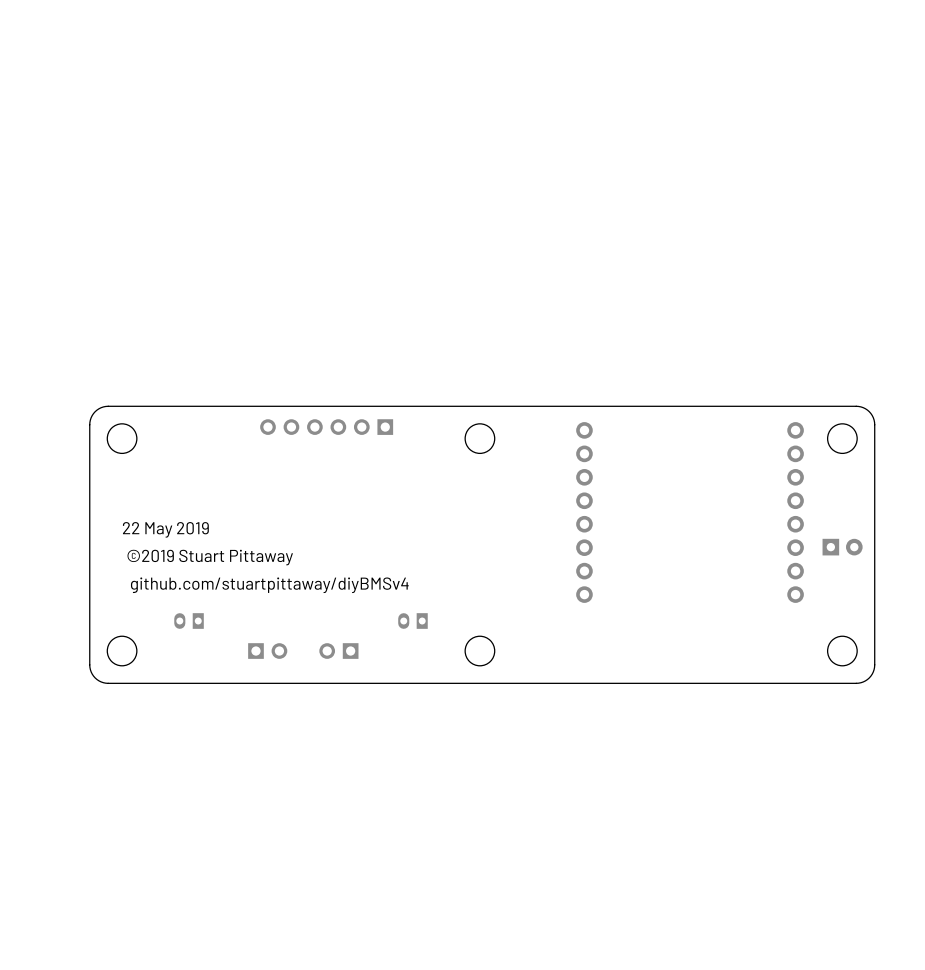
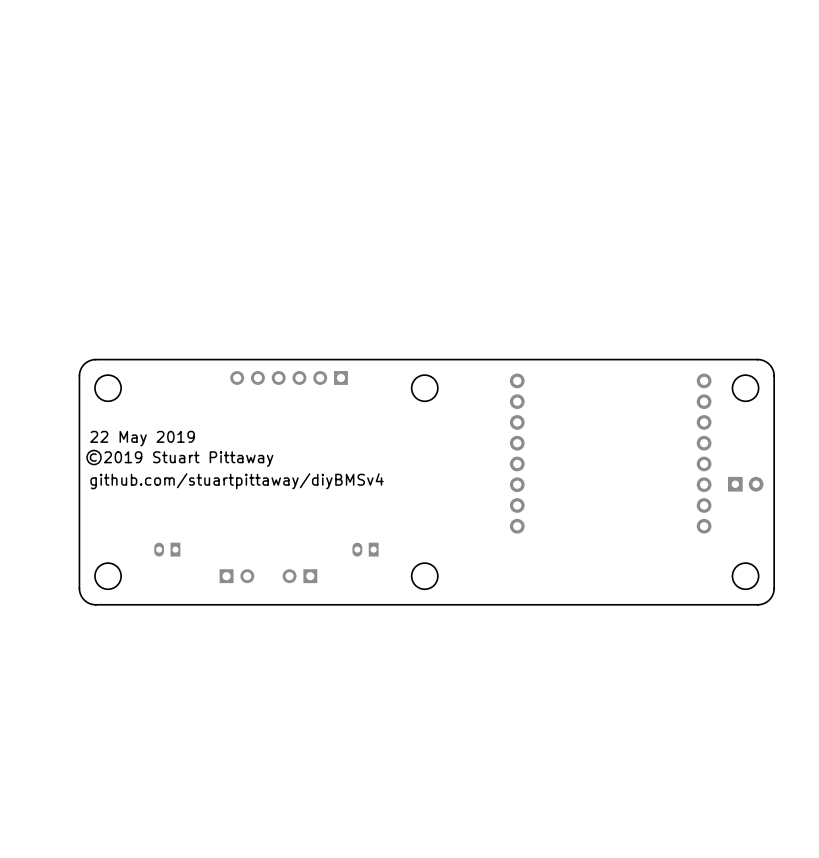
text position: 22 May 2019 (165, 529) -> 22 May 2019 (142, 438)
text position: ©2019 Stuart Pittaway (210, 557) -> ©2019 Stuart Pittaway (179, 458)
text position: github.com/stuartpittaway/diyBMSv4 (269, 585) -> github.com/stuartpittaway/diyBMSv4 (237, 481)

